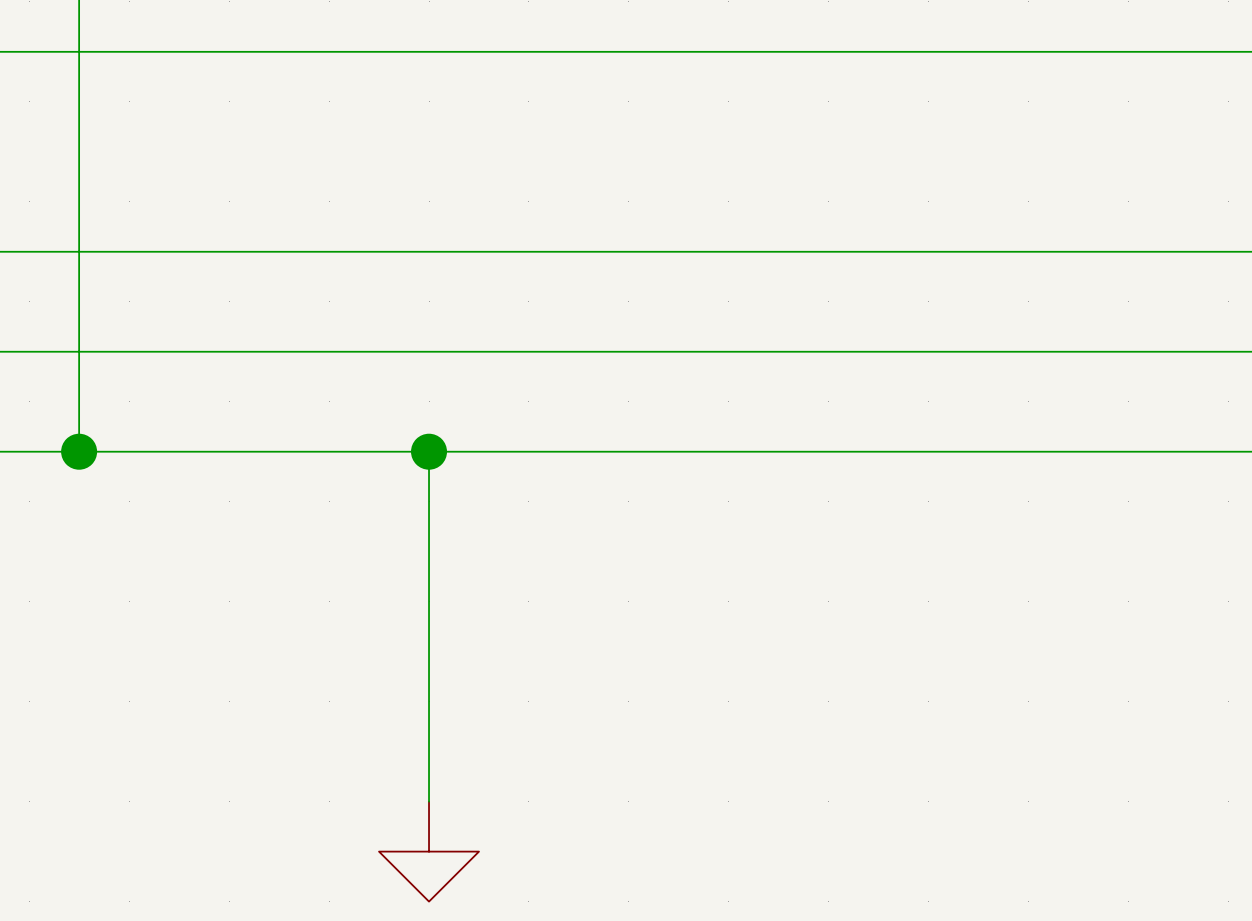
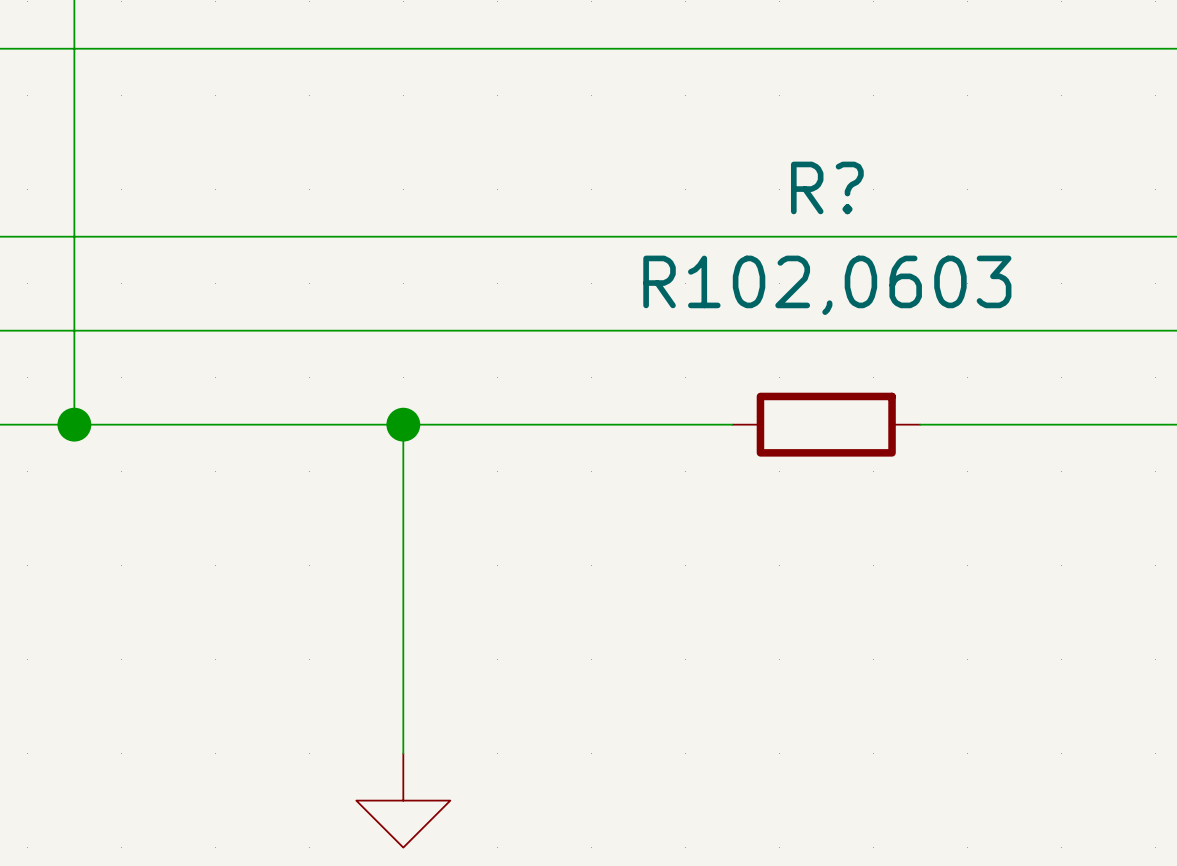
wire: (778, 451) (978, 451) -> none
R?: none -> R102,0603 (826, 424)

